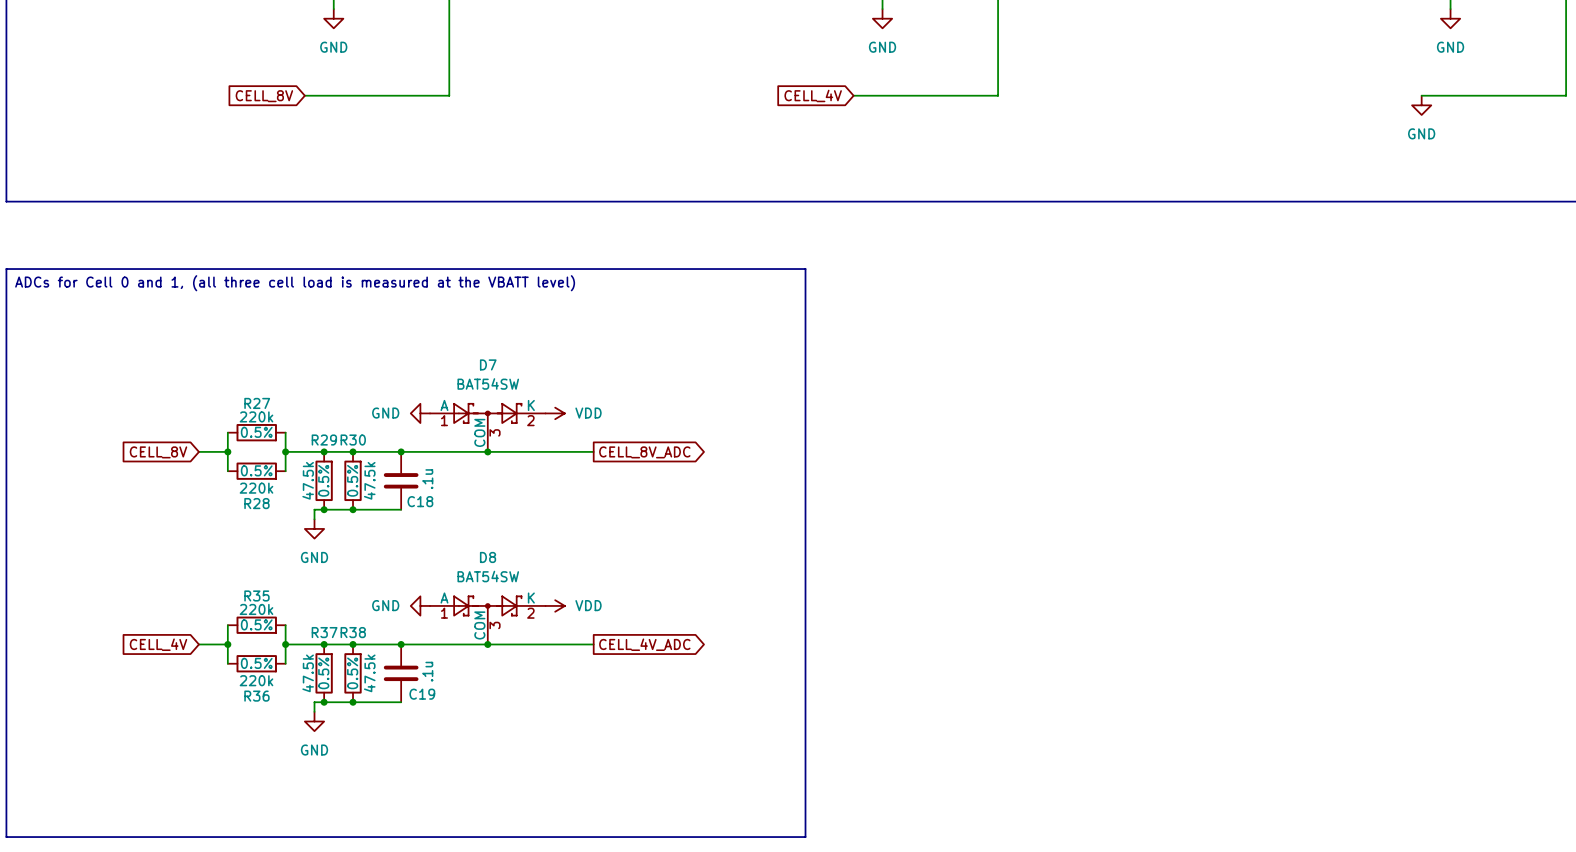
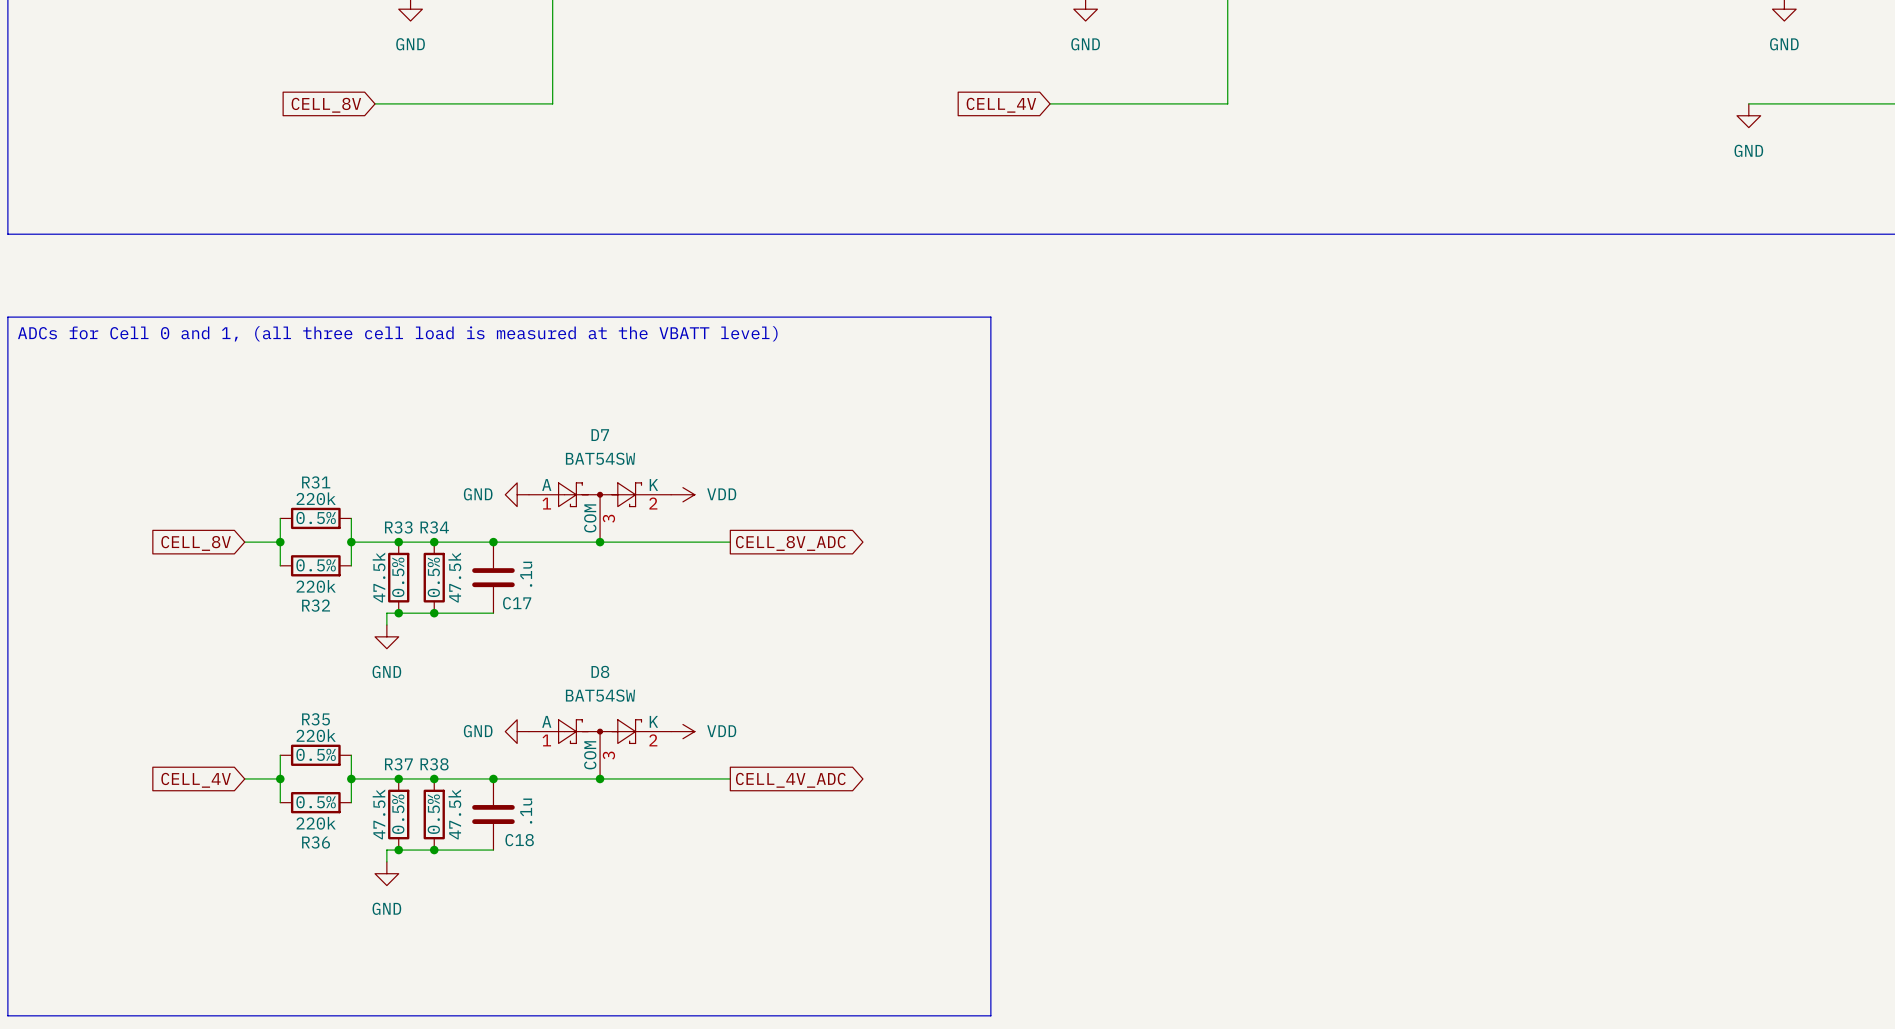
R27 name: R27 (257, 403) -> R31 (316, 482)
R29 name: R29 (324, 440) -> R33 (398, 527)
R30 name: R30 (353, 440) -> R34 (434, 527)
C18 name: C18 (420, 501) -> C17 (517, 603)
R28 name: R28 (256, 503) -> R32 (316, 605)
C19 name: C19 (422, 694) -> C18 (519, 840)

